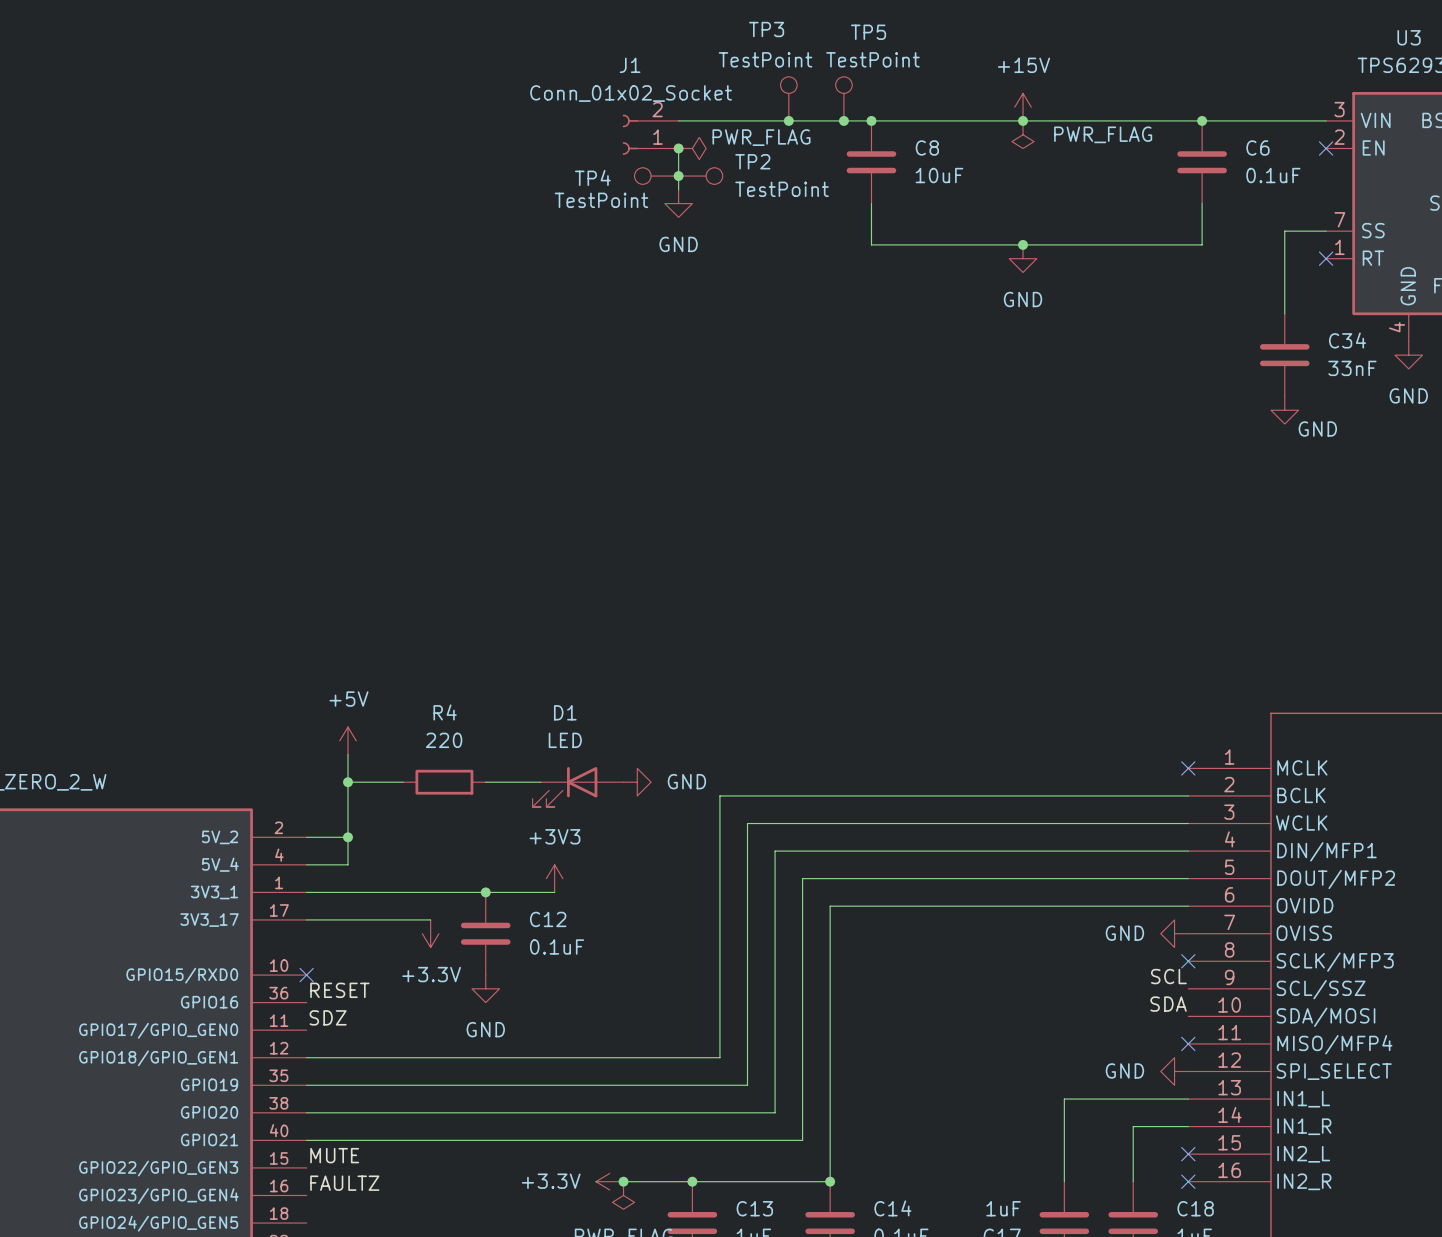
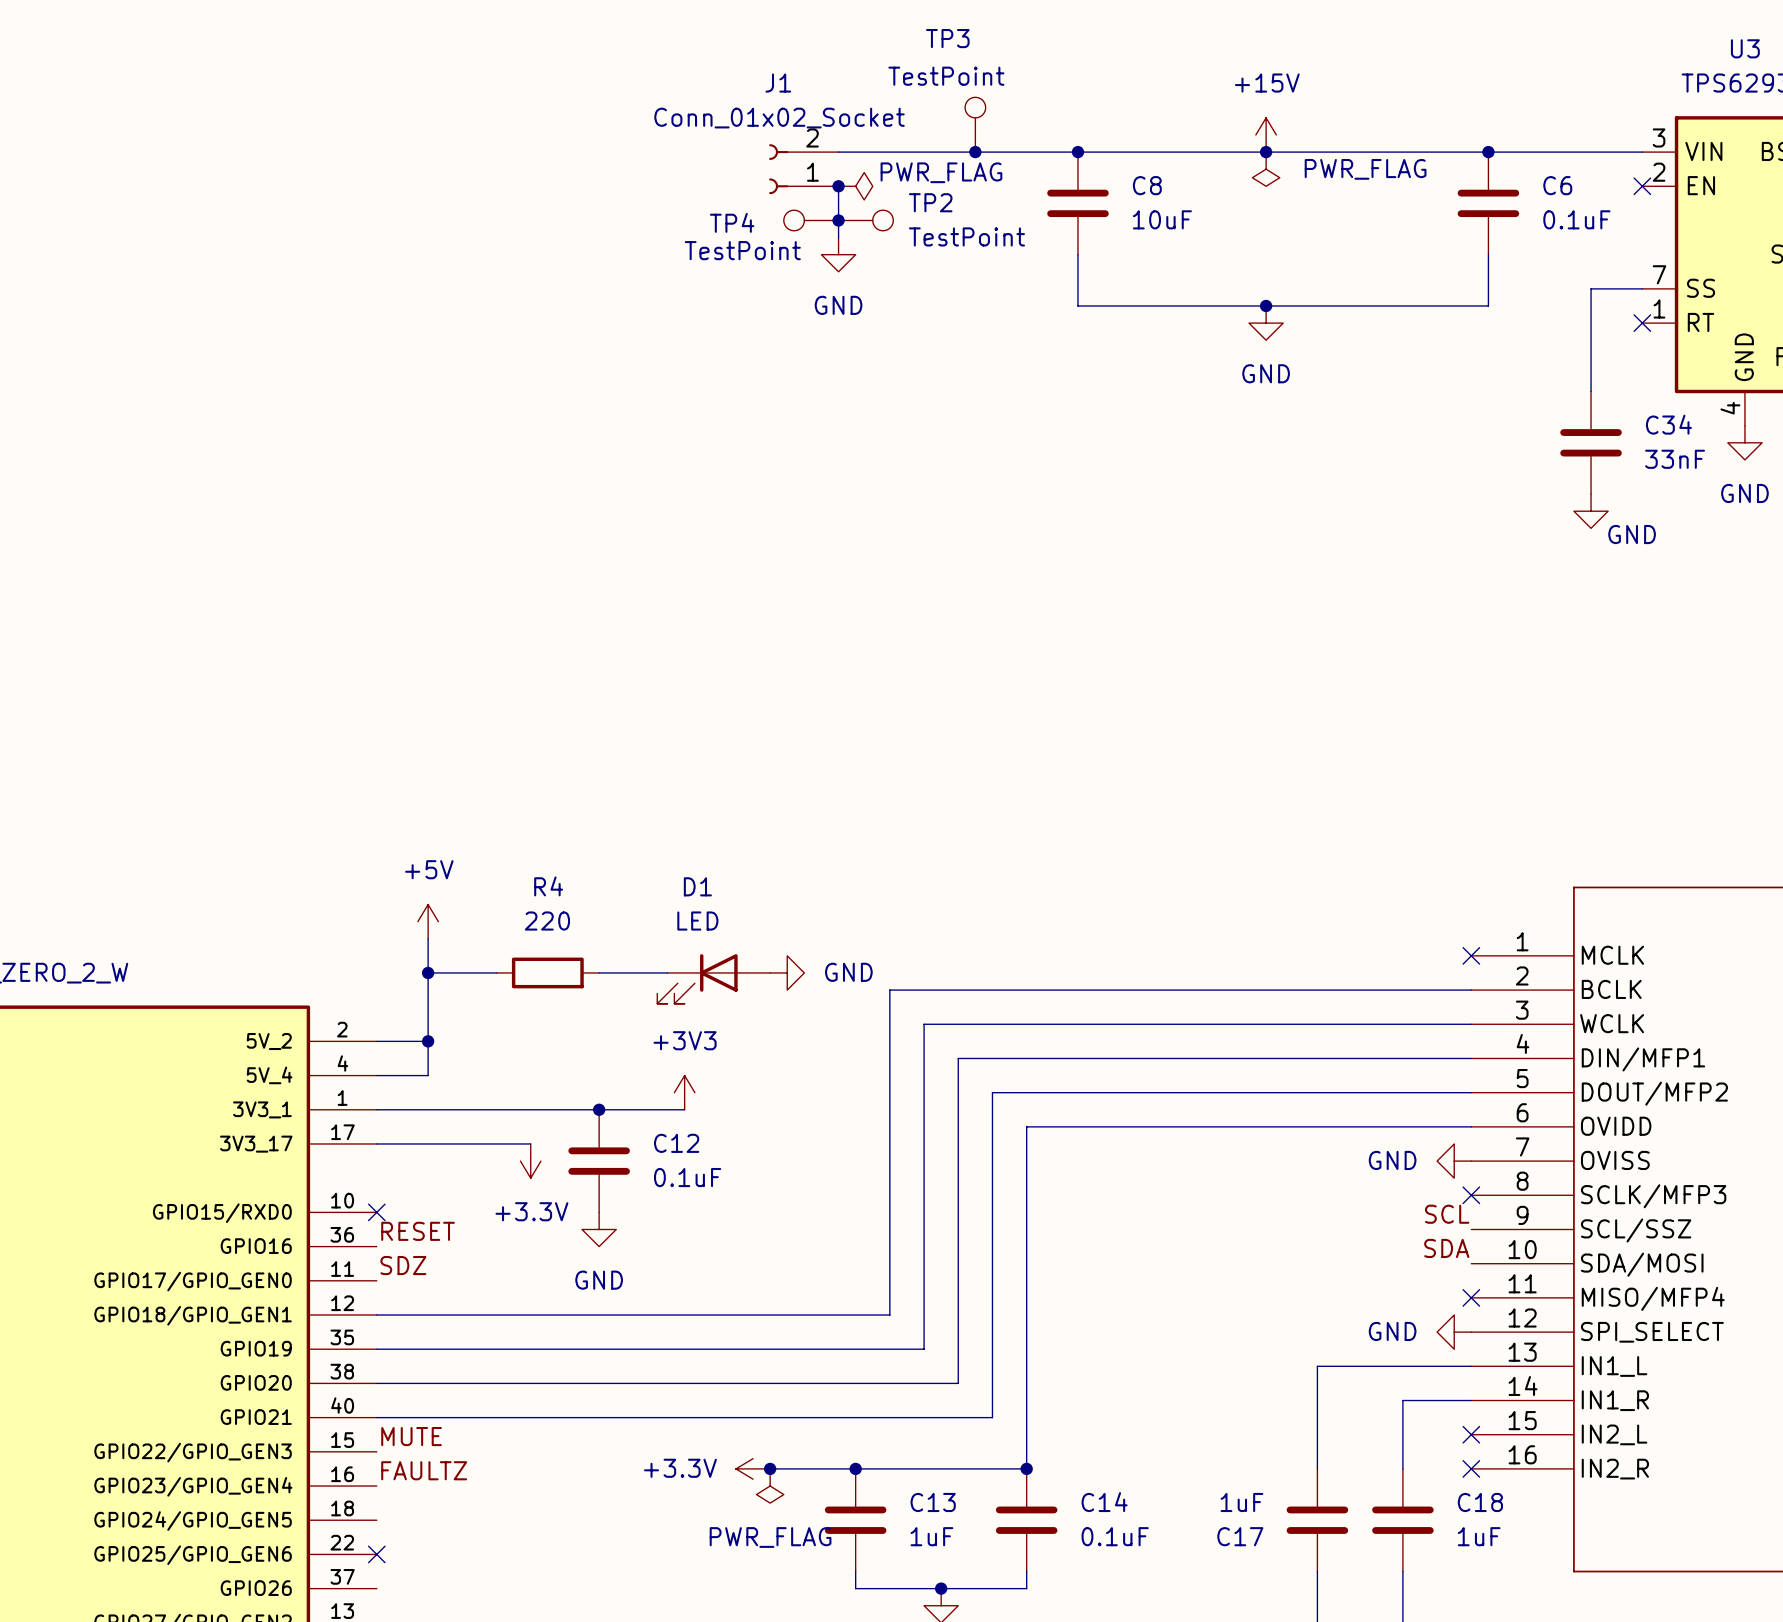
TP5: TestPoint (843, 98) -> none
junction: (843, 120) -> none

